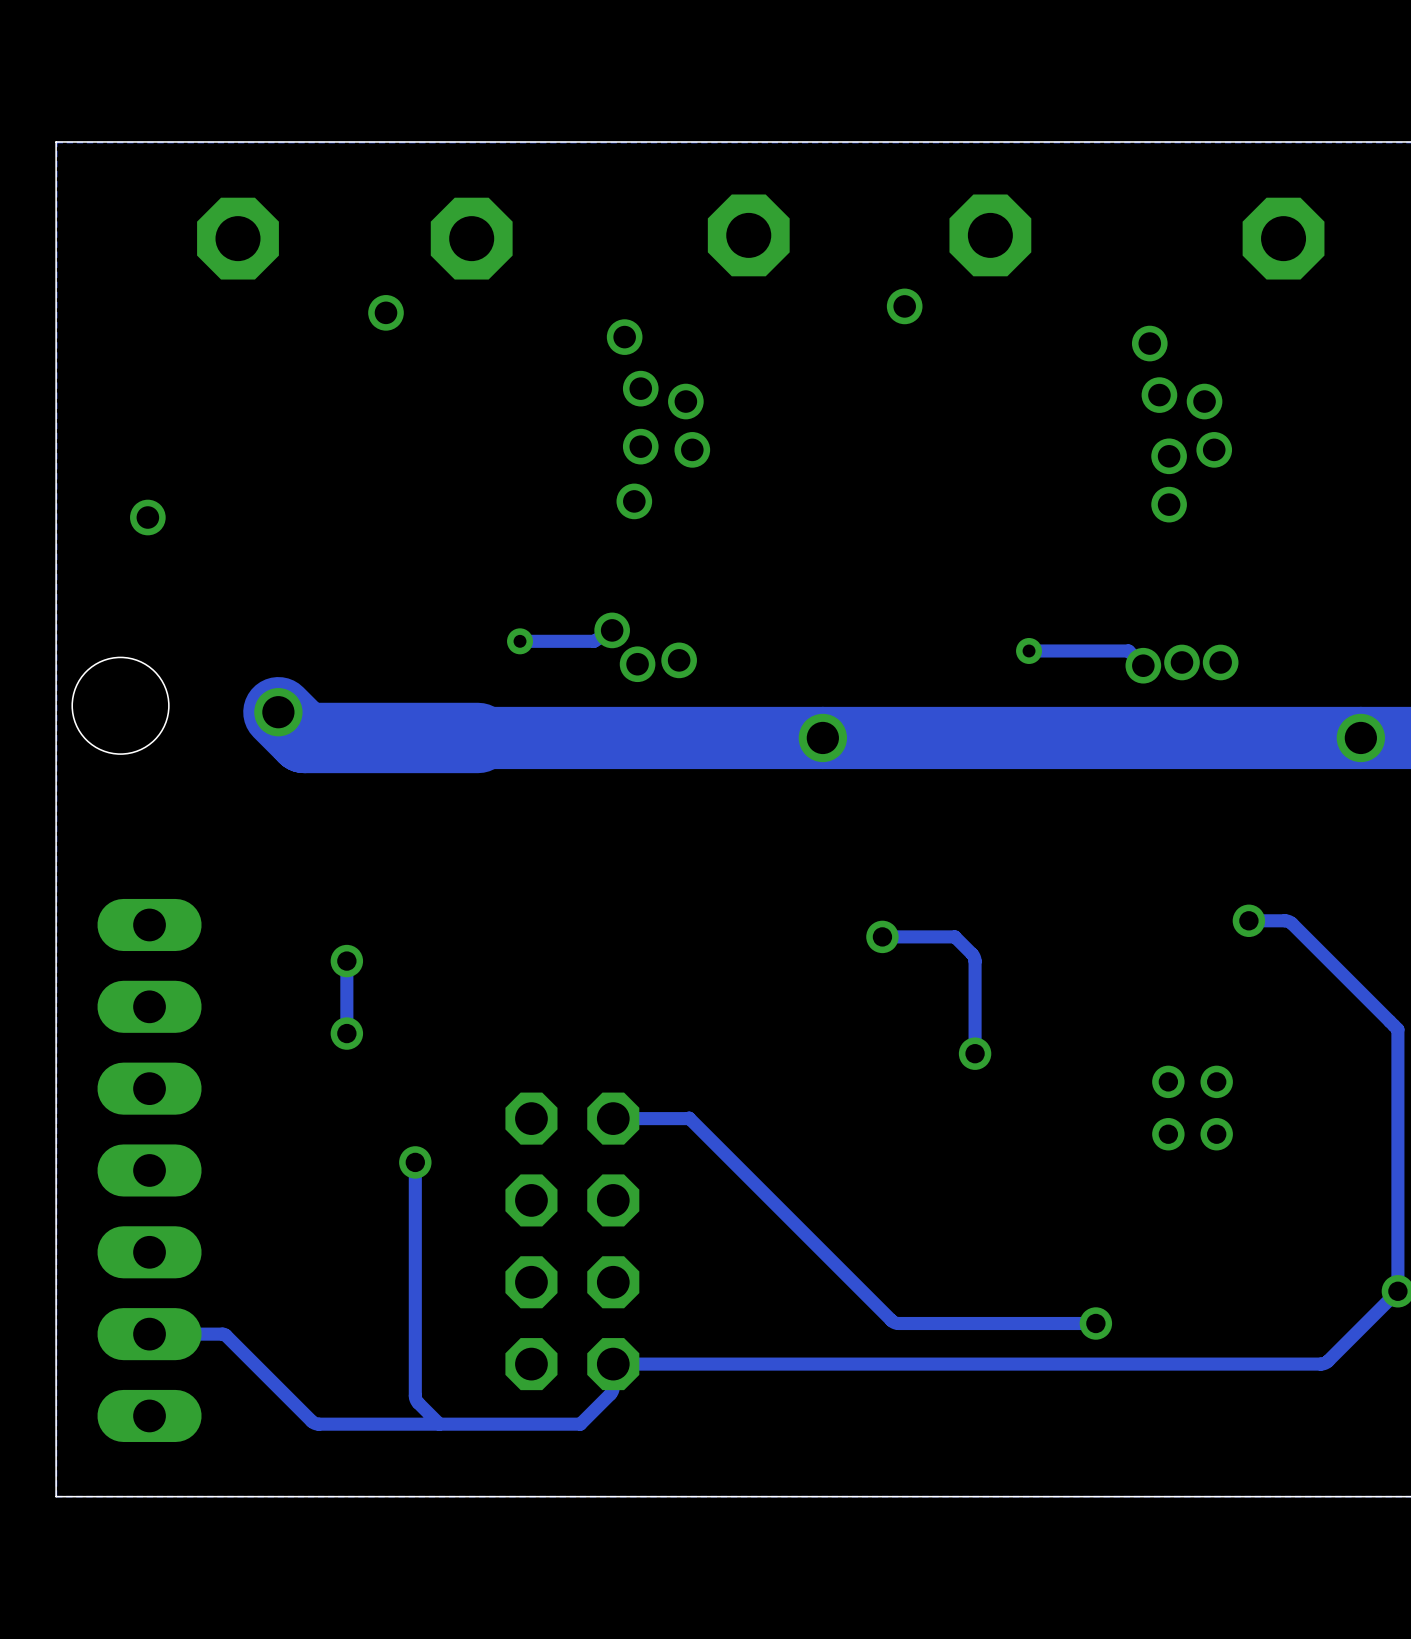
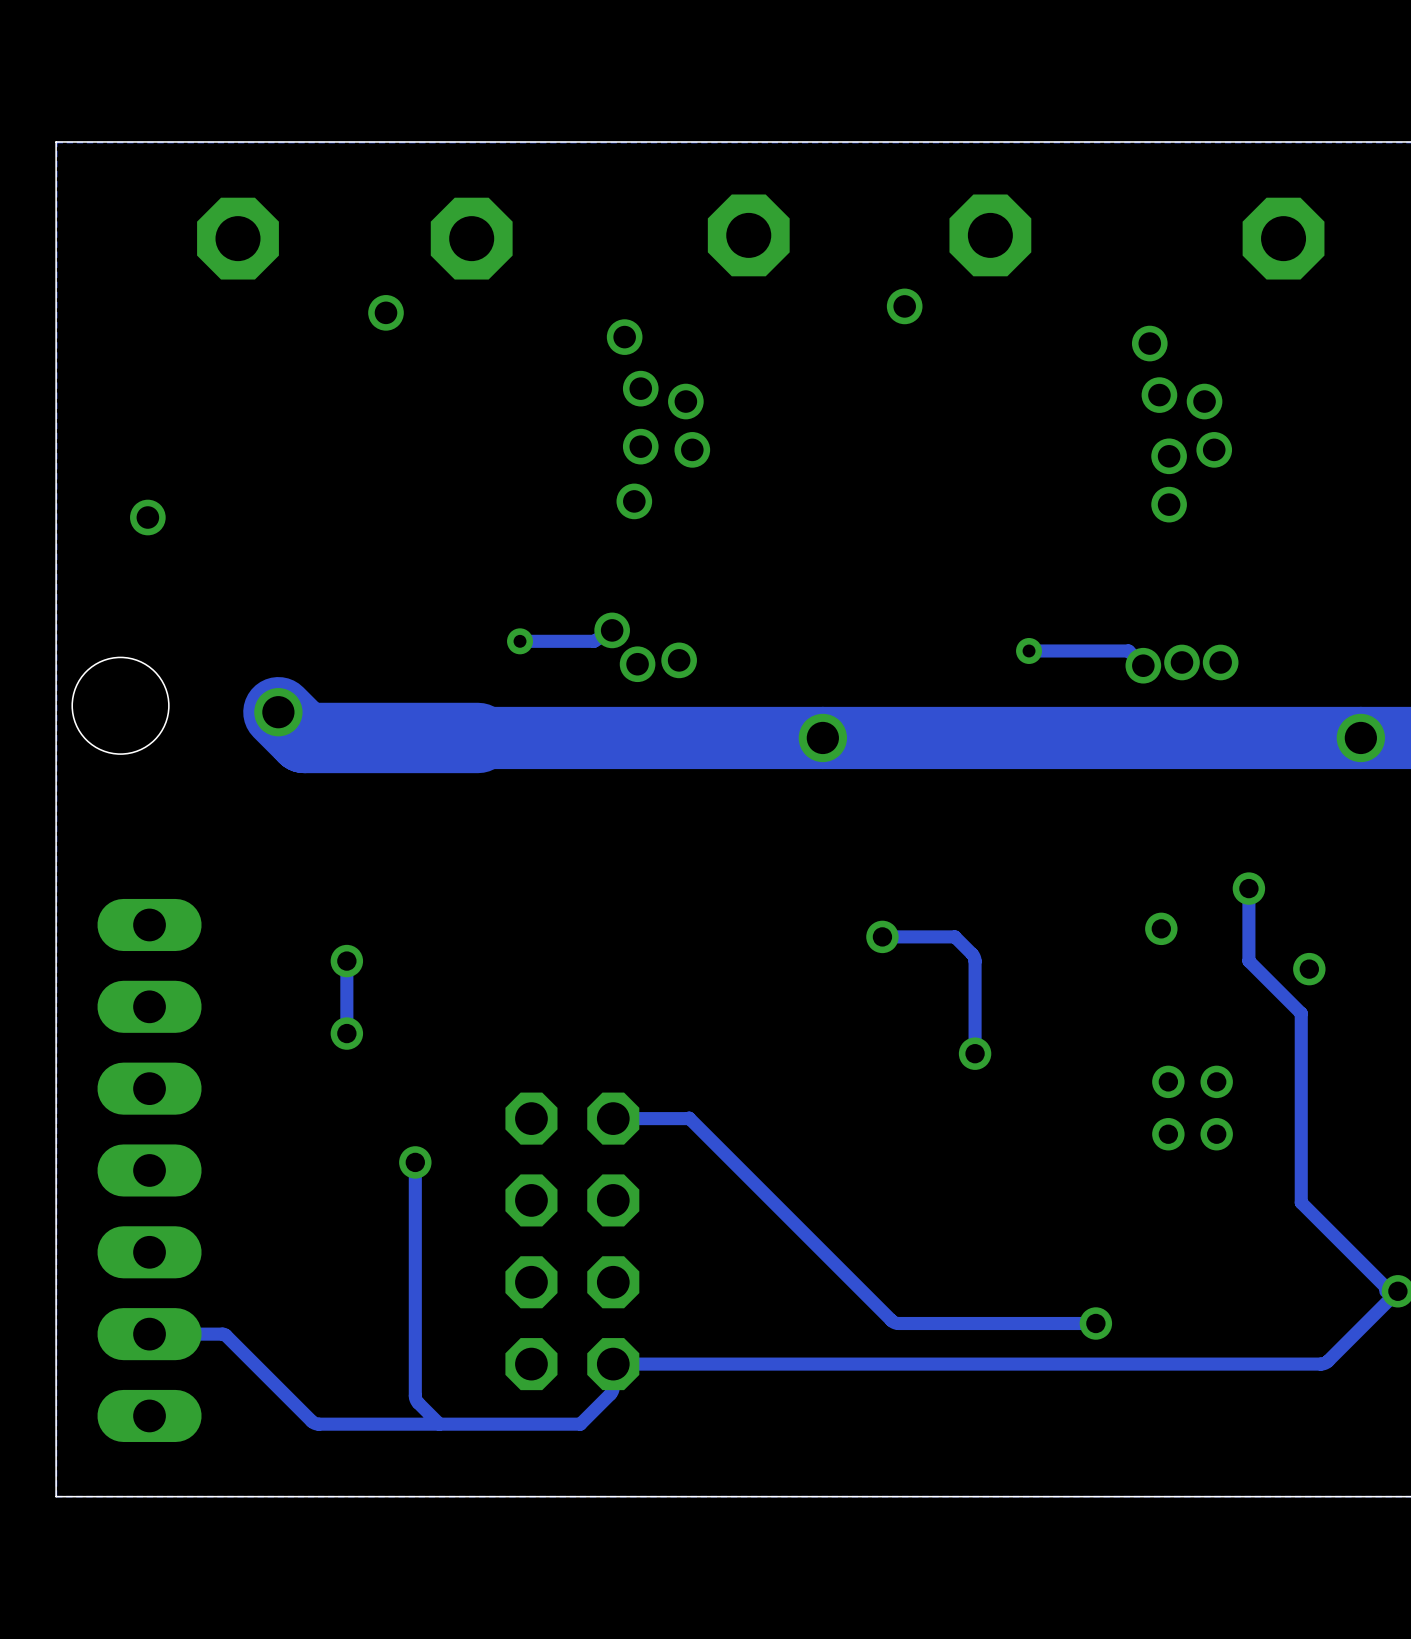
track: (1248, 920) (1284, 920) (1291, 922) (1397, 1029) (1397, 1291) -> (1256, 888) (1248, 888) (1248, 961) (1301, 1013) (1301, 1202) (1385, 1287) (1385, 1291) (1397, 1291)
via position: (1248, 920) -> (1248, 888)
via: none -> (1161, 928)
via: none -> (1309, 969)

